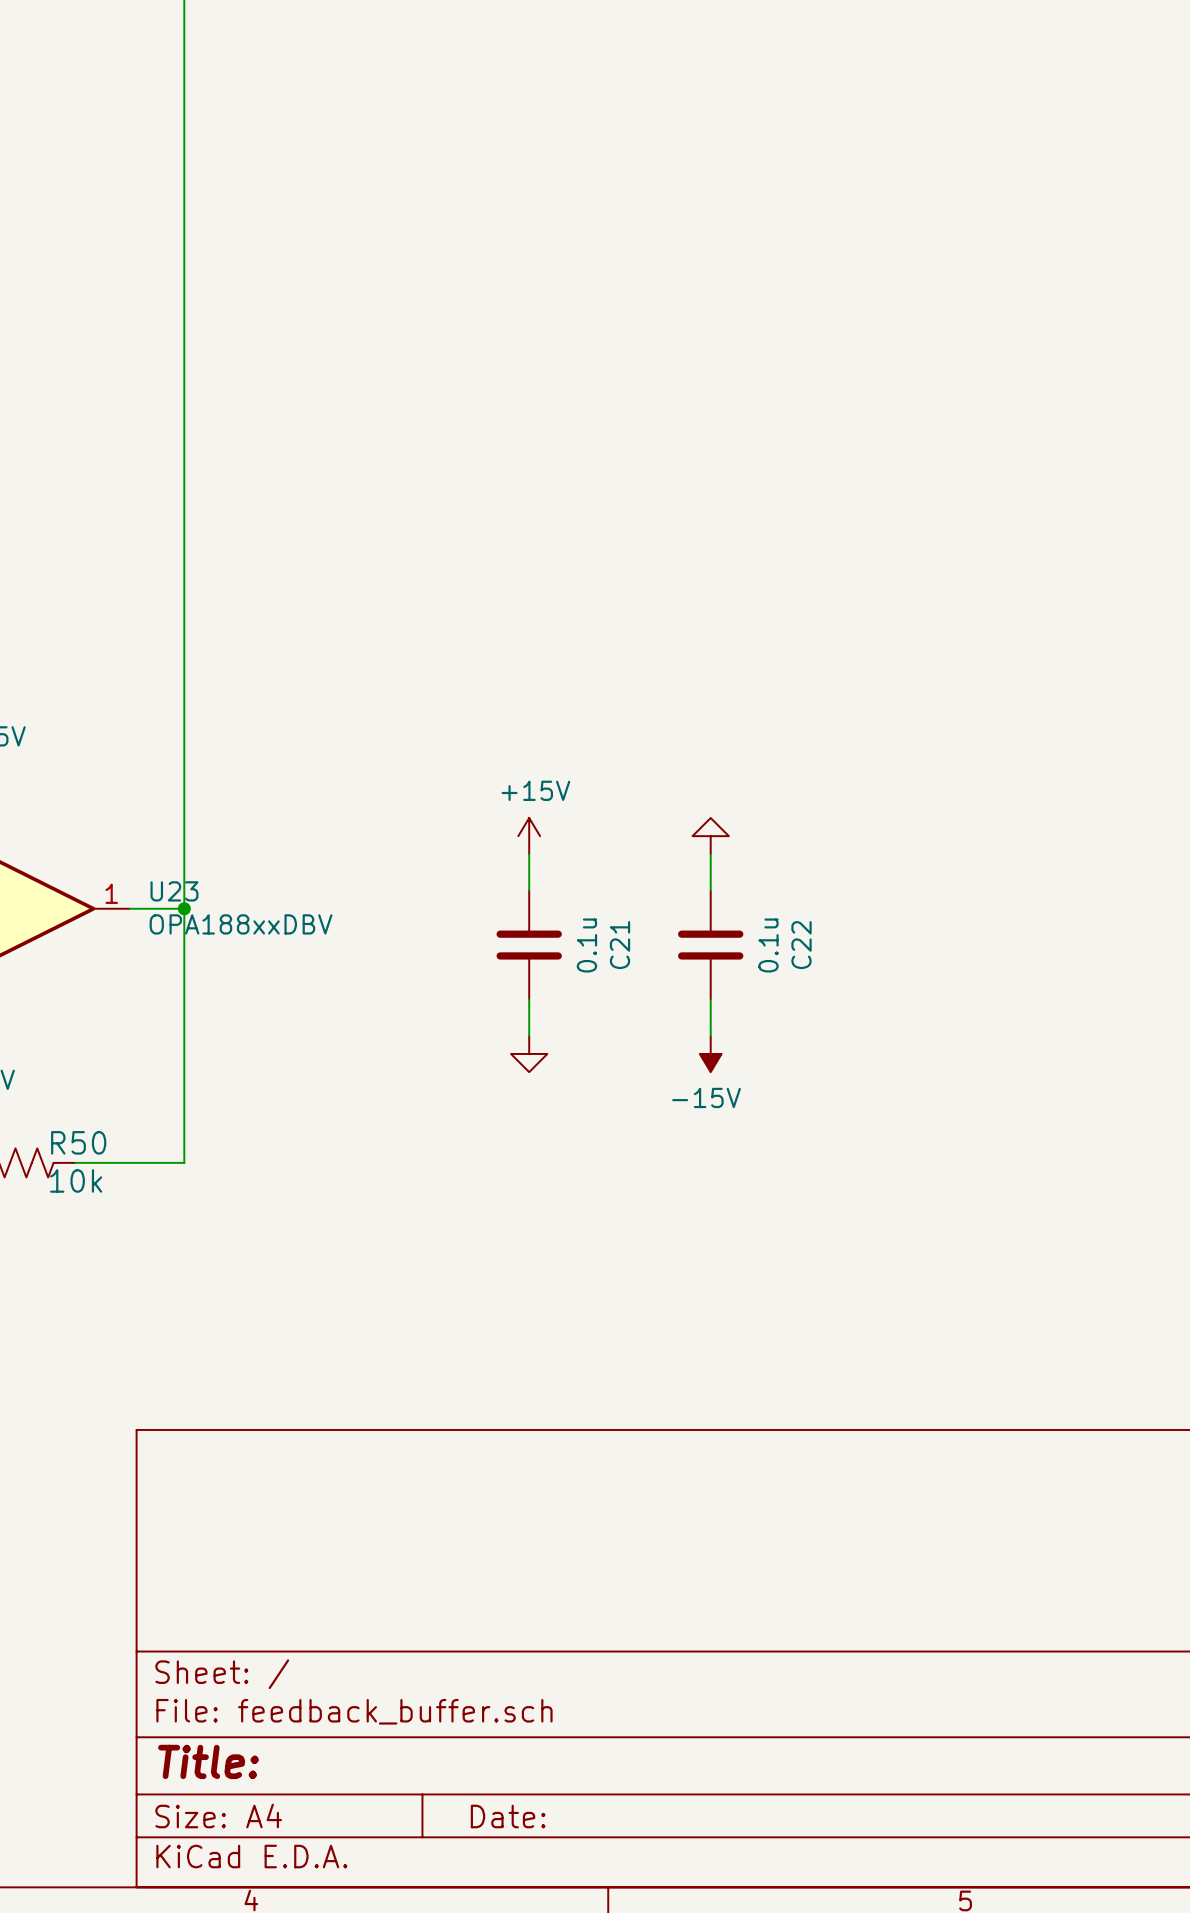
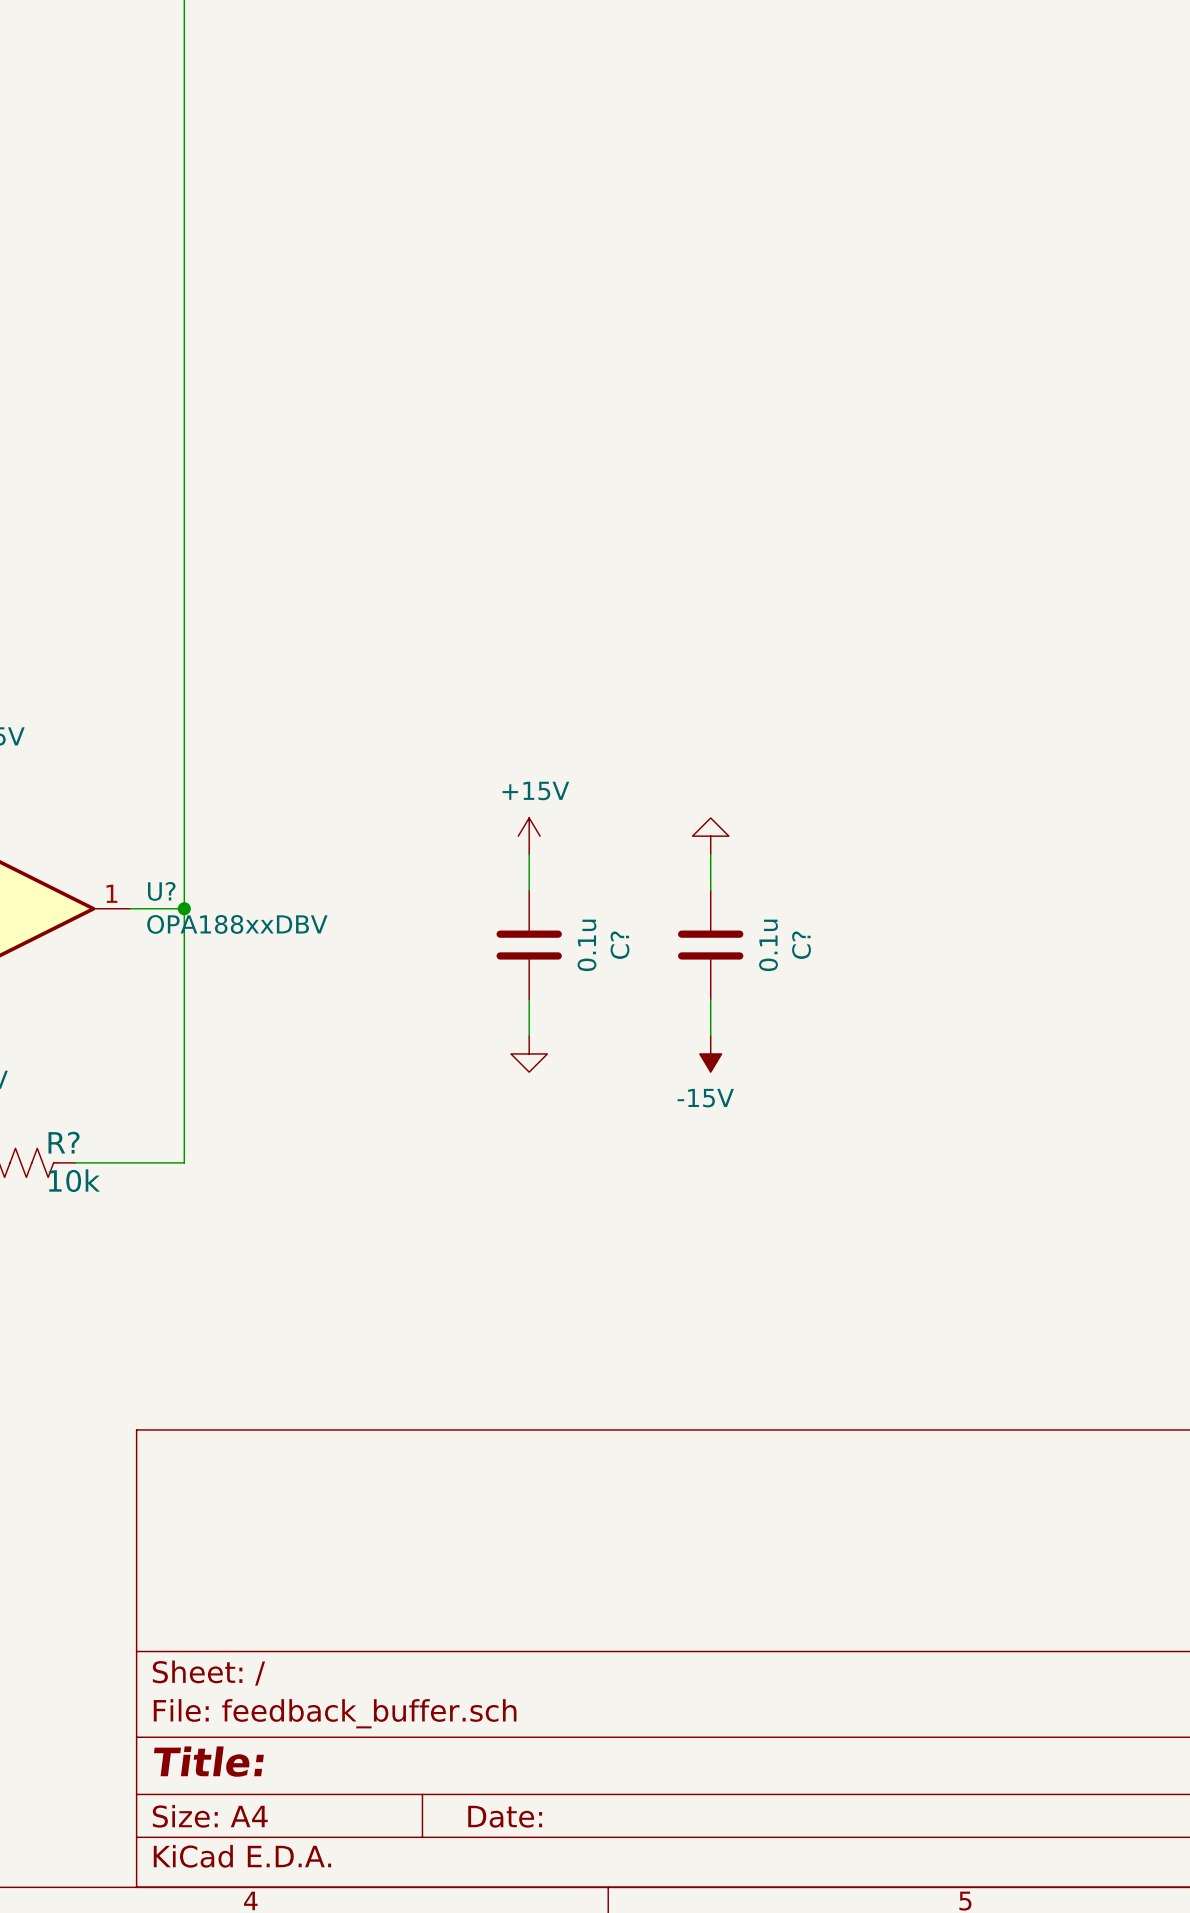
U23 name: U23 (174, 891) -> U? (161, 891)
C21 name: C21 (620, 945) -> C? (620, 945)
C22 name: C22 (801, 945) -> C? (801, 945)
R50 name: R50 (78, 1142) -> R? (64, 1142)

